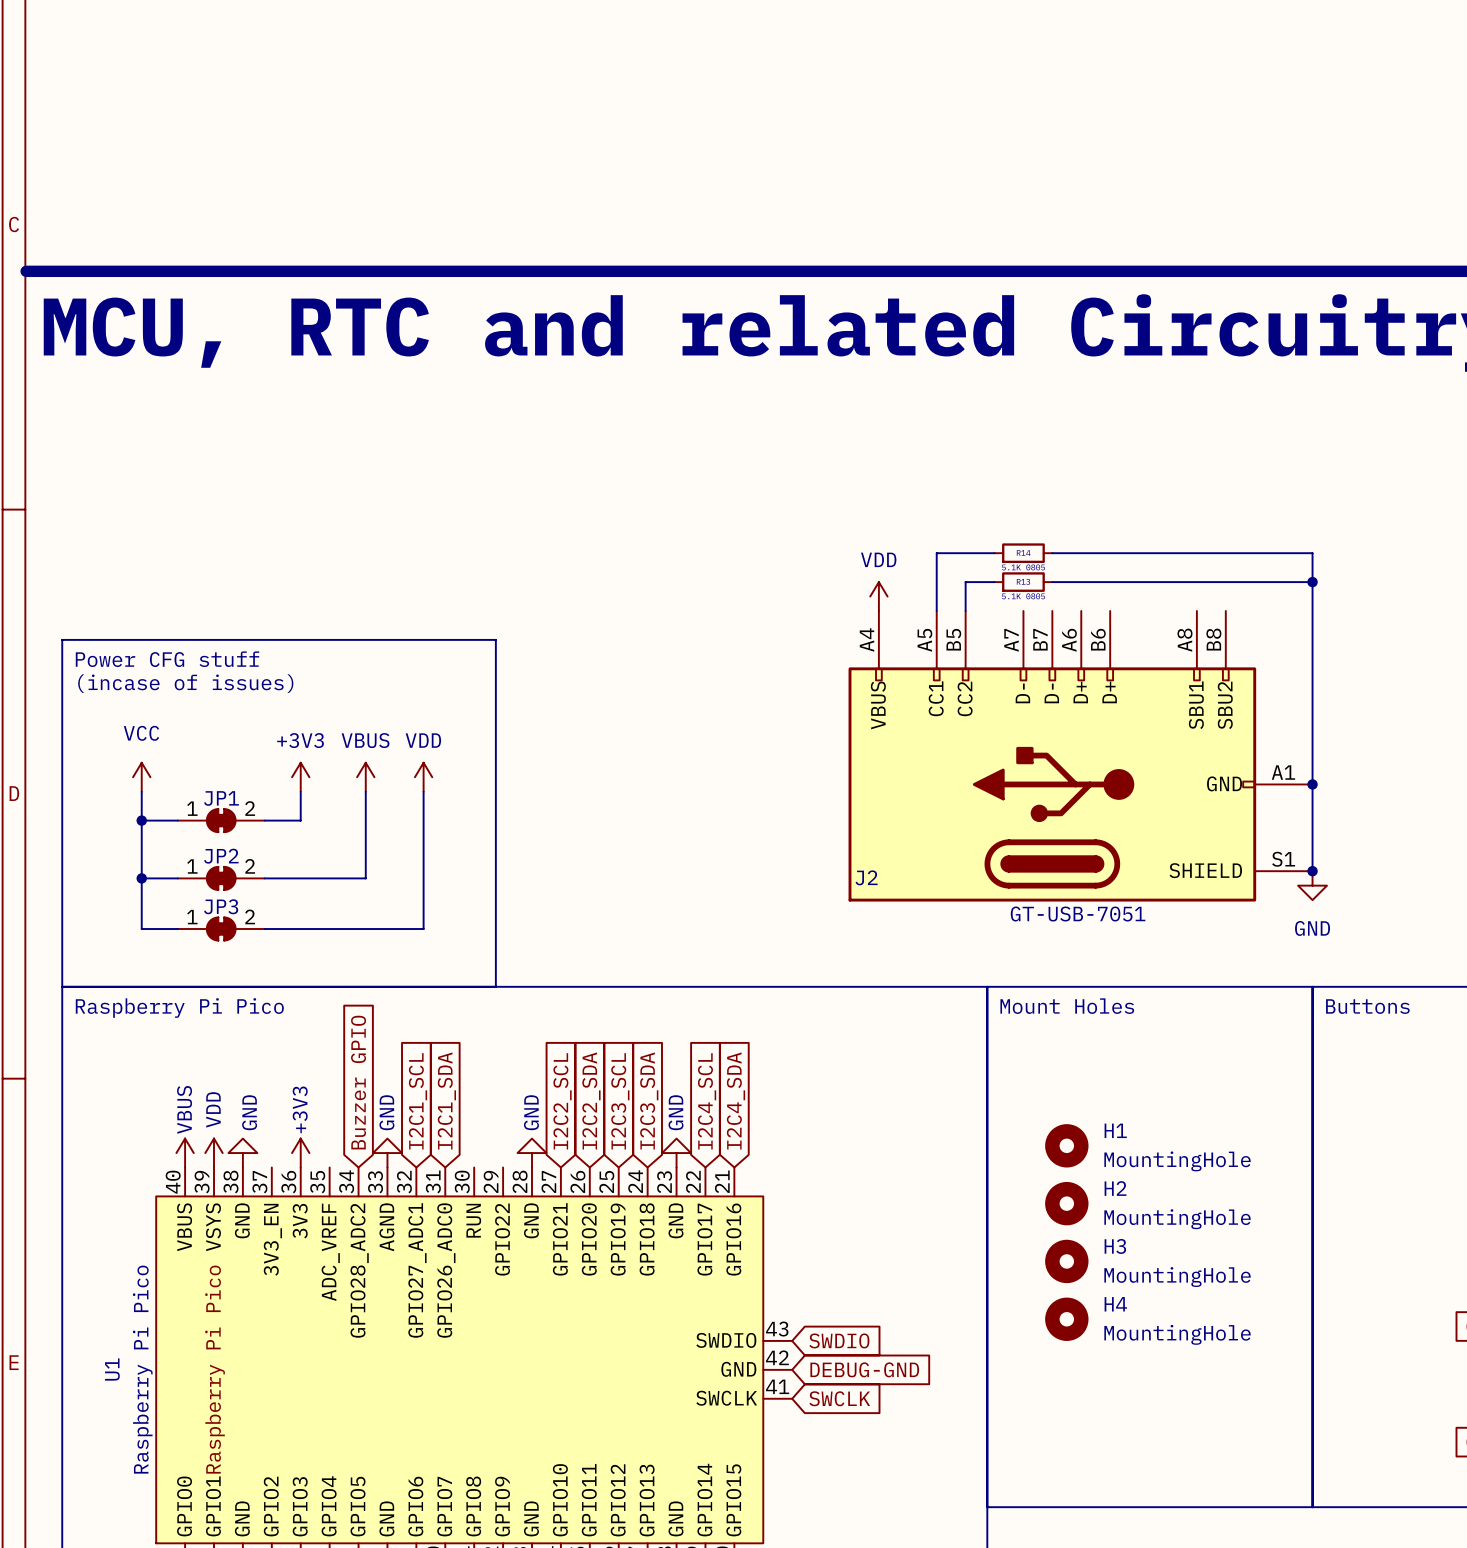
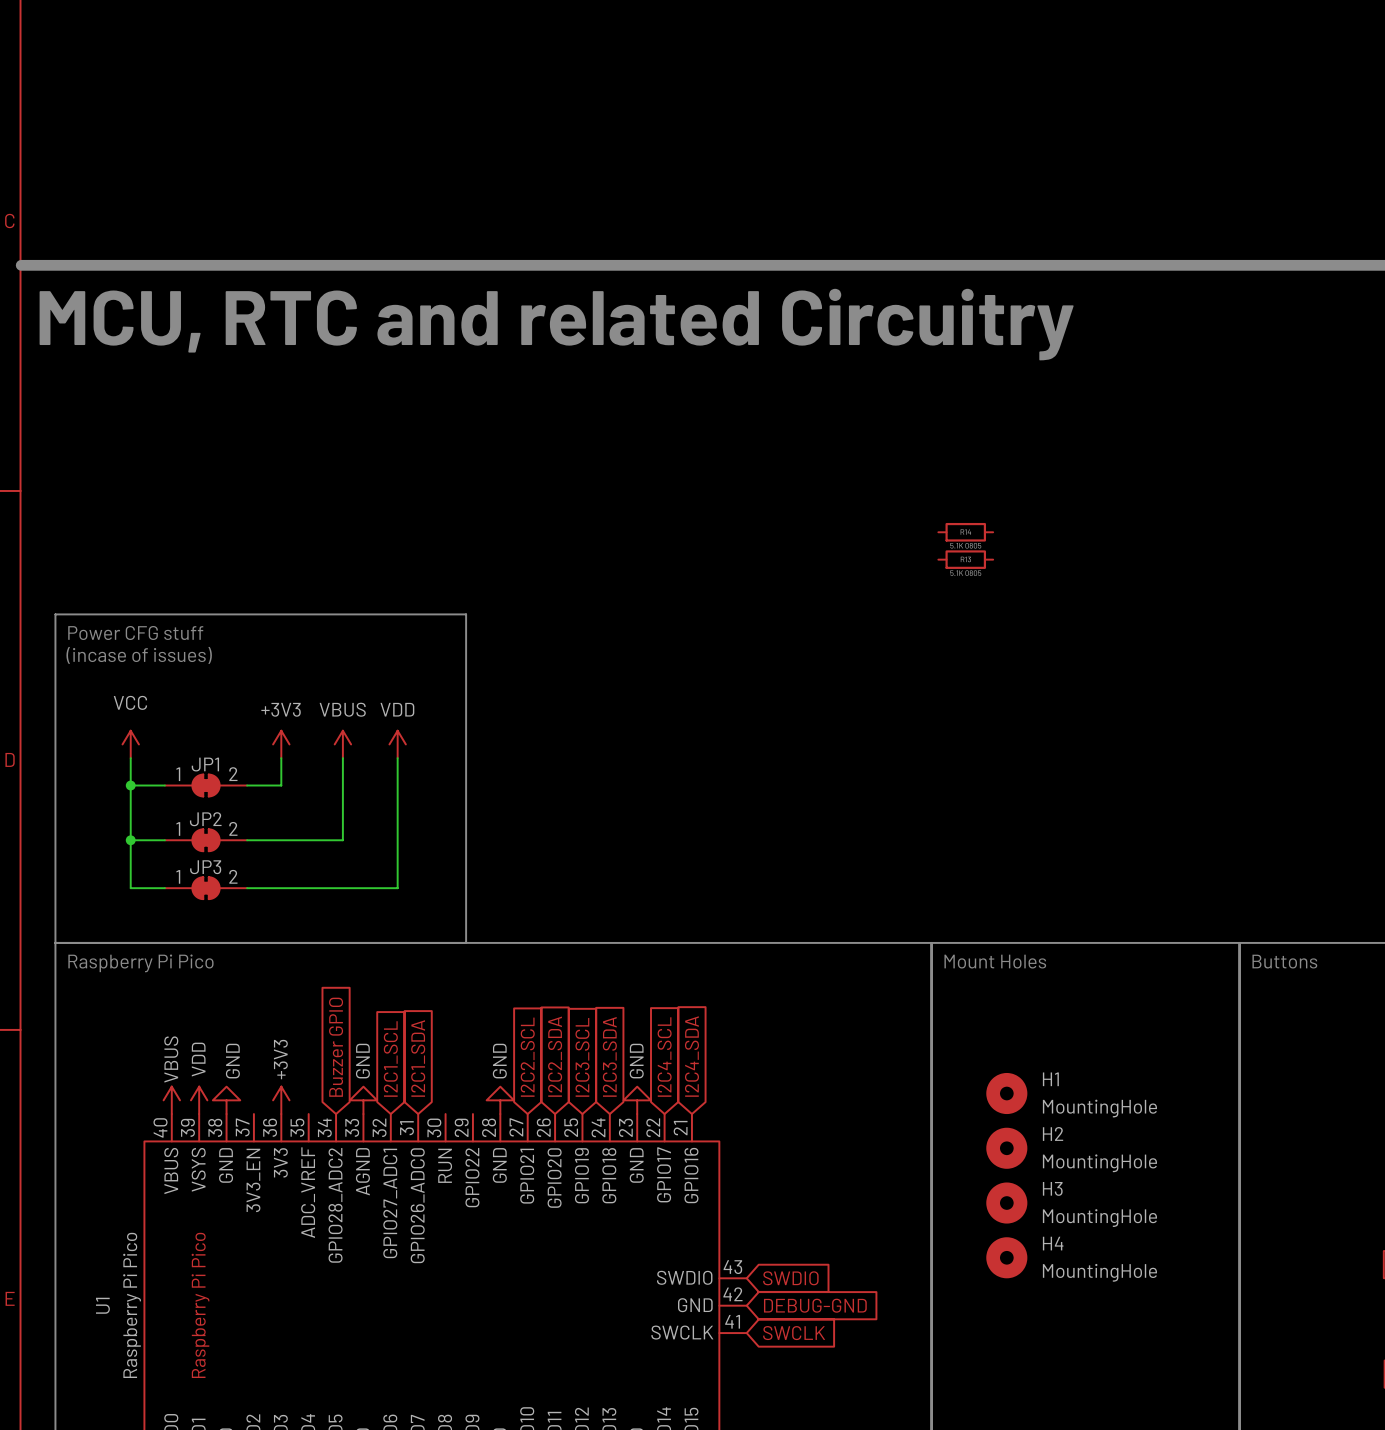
wire: (994, 553) (936, 553) (936, 611) -> none
wire: (1052, 553) (1312, 553) (1312, 871) -> none
wire: (994, 582) (965, 582) (965, 611) -> none
wire: (1052, 582) (1312, 582) -> none
junction: (1312, 582) -> none
power symbol: VDD (878, 596) -> none
J2: GT-USB-7051 (1080, 756) -> none
junction: (1312, 784) -> none
junction: (1312, 871) -> none
power symbol: GND (1312, 885) -> none

